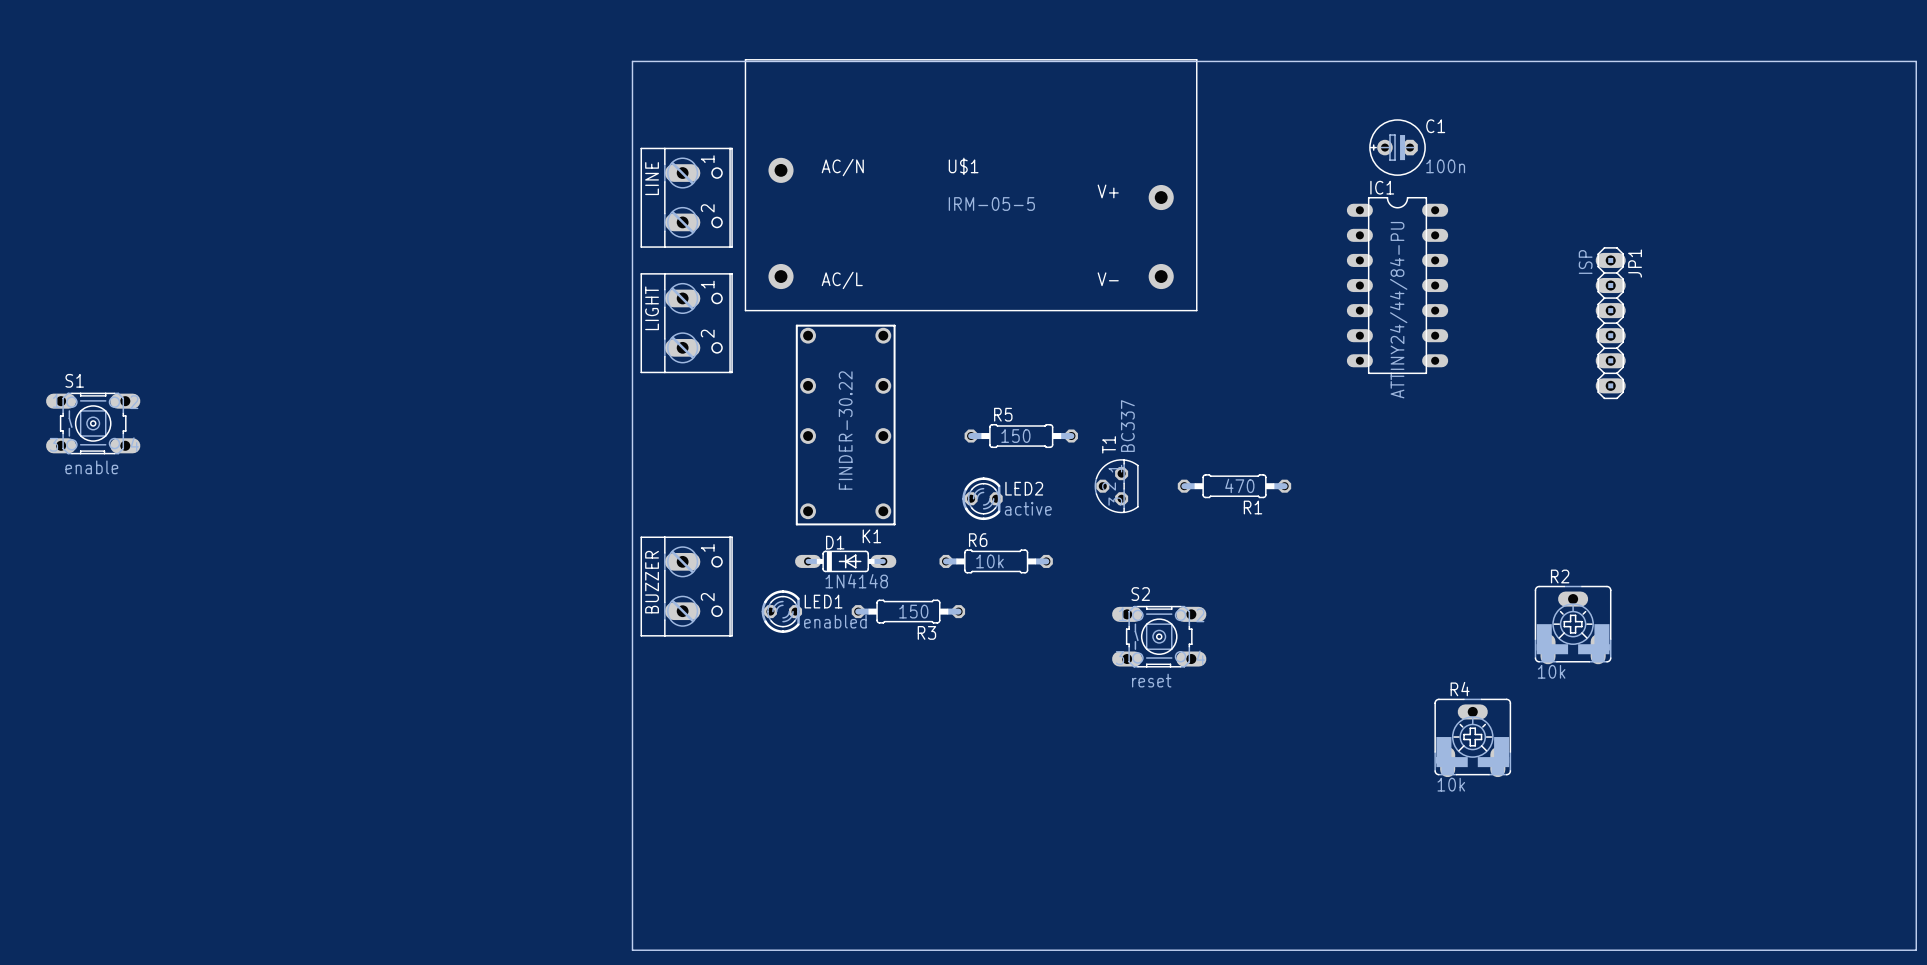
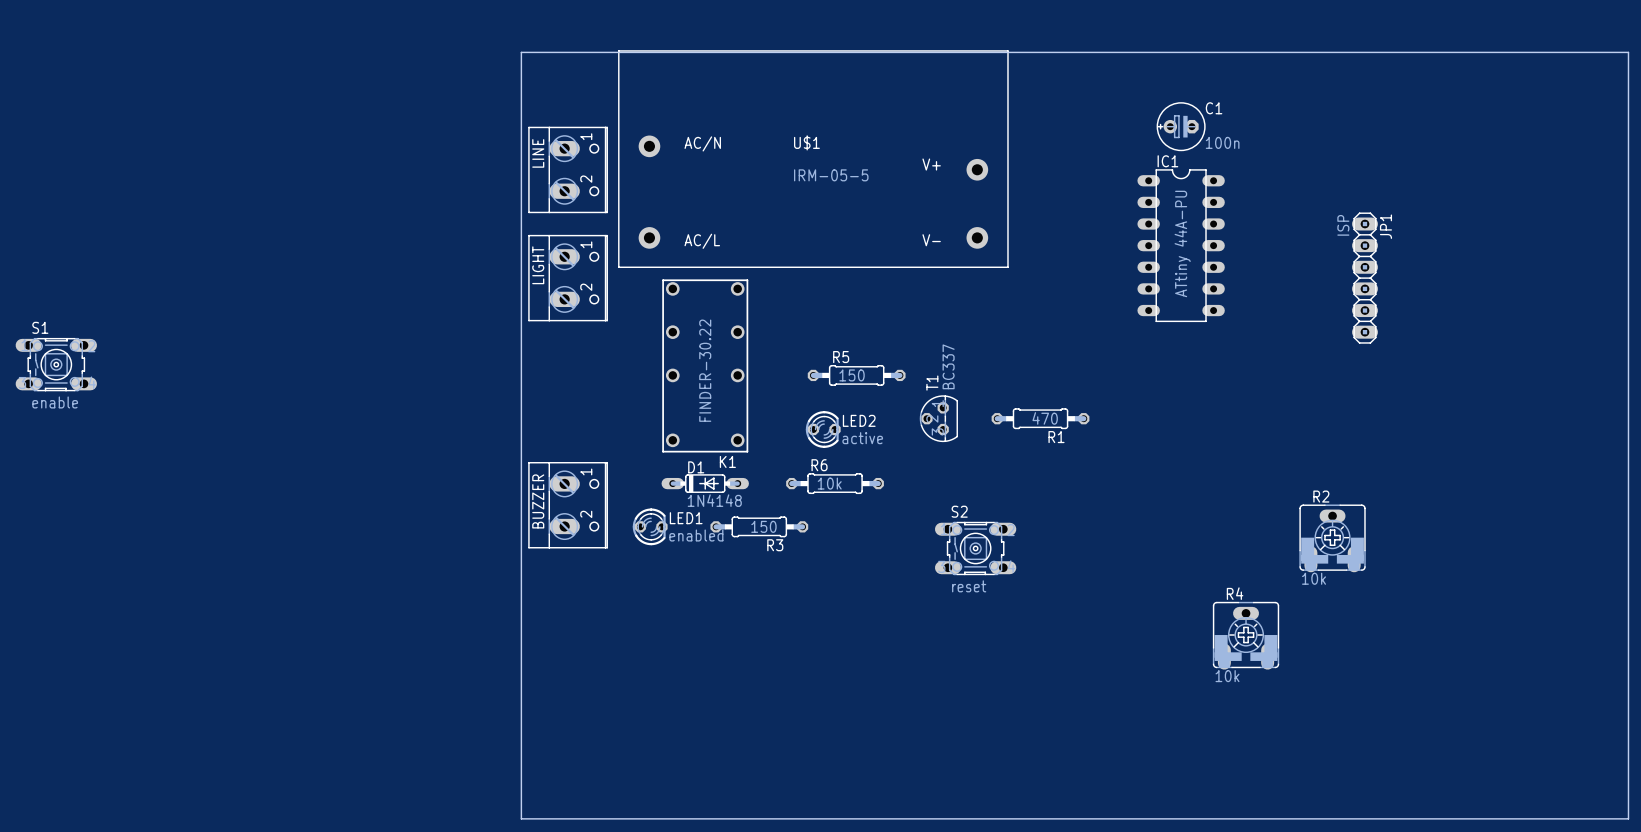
IC1 value: ATTINY24/44/84-PU (1398, 310) -> ATtiny 44A-PU (1182, 243)

